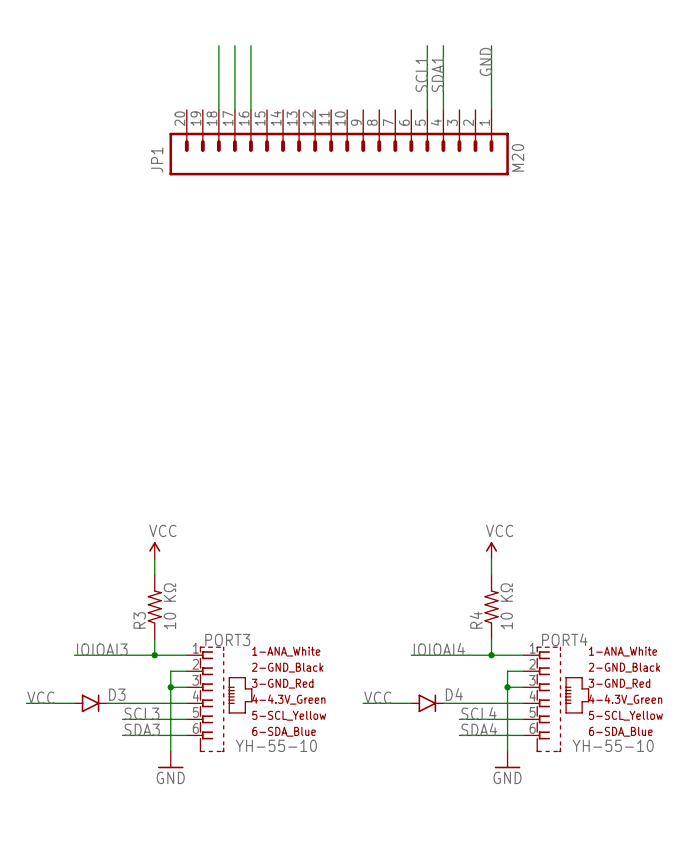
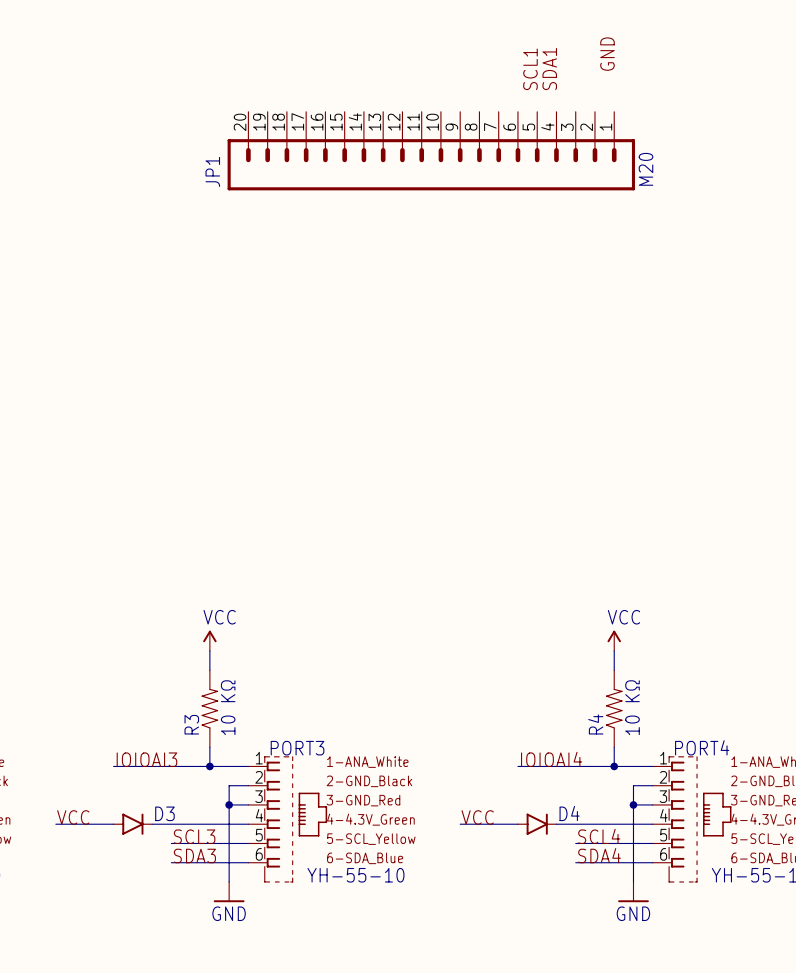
wire: (218, 45) (218, 109) -> none
wire: (234, 45) (234, 109) -> none
wire: (250, 45) (250, 109) -> none
wire: (427, 45) (427, 109) -> none
wire: (443, 45) (443, 109) -> none
wire: (491, 45) (491, 109) -> none

